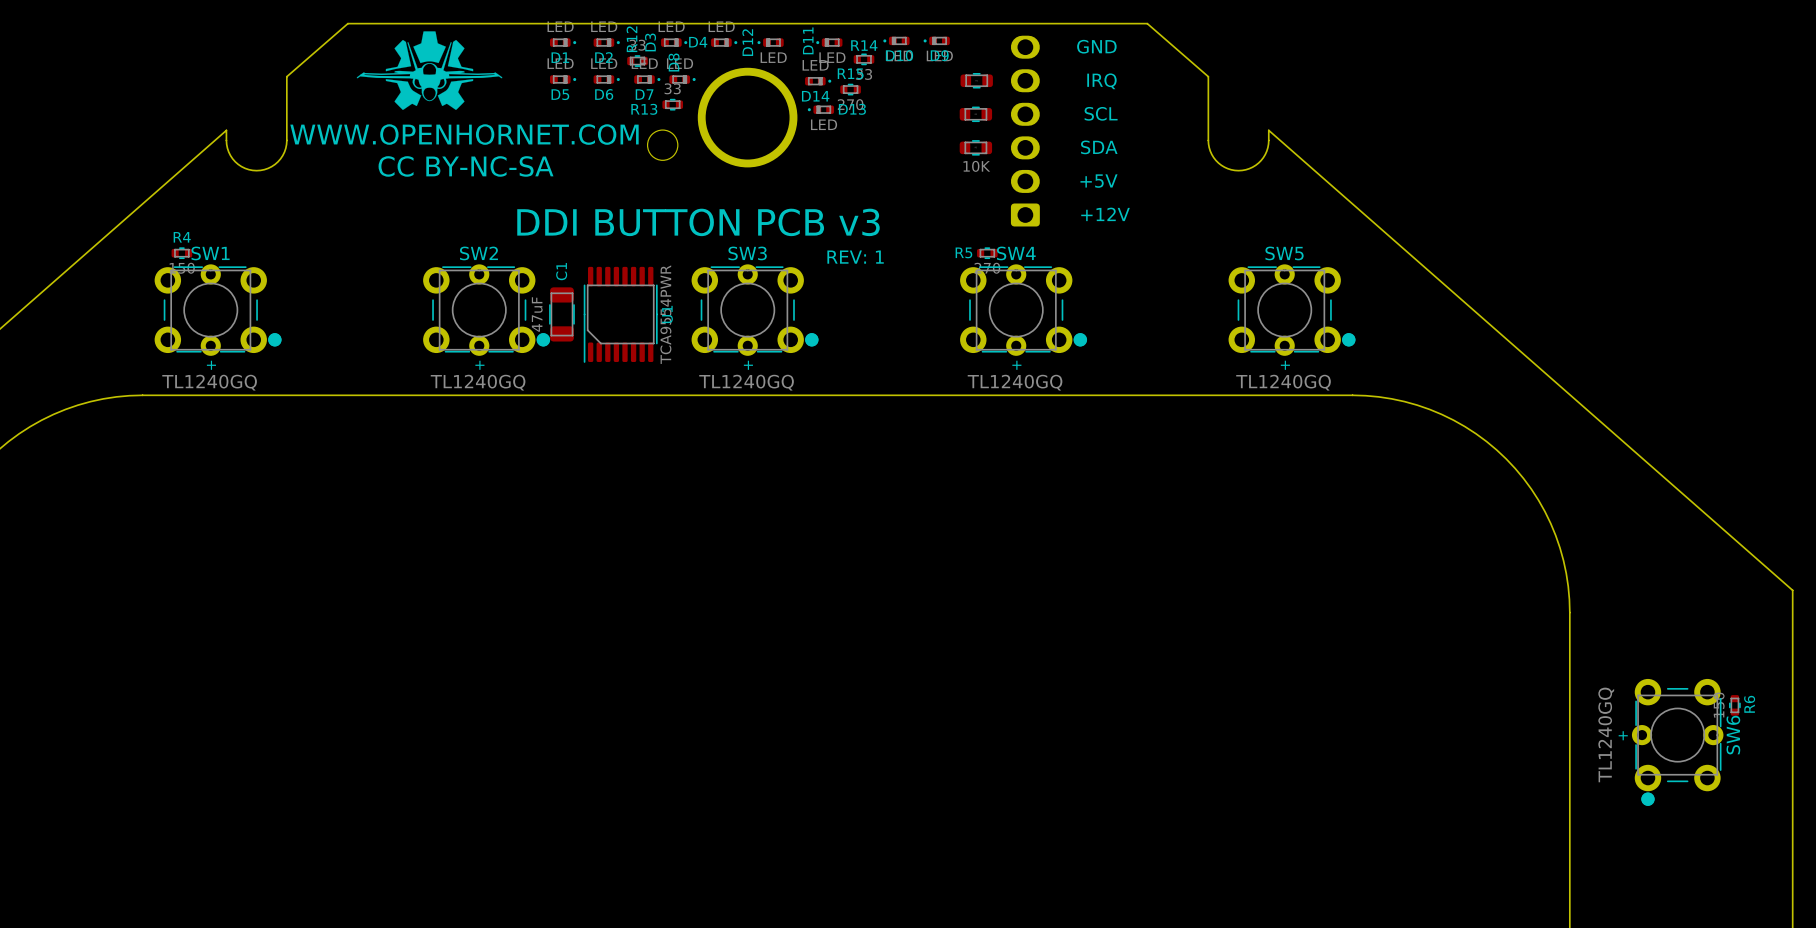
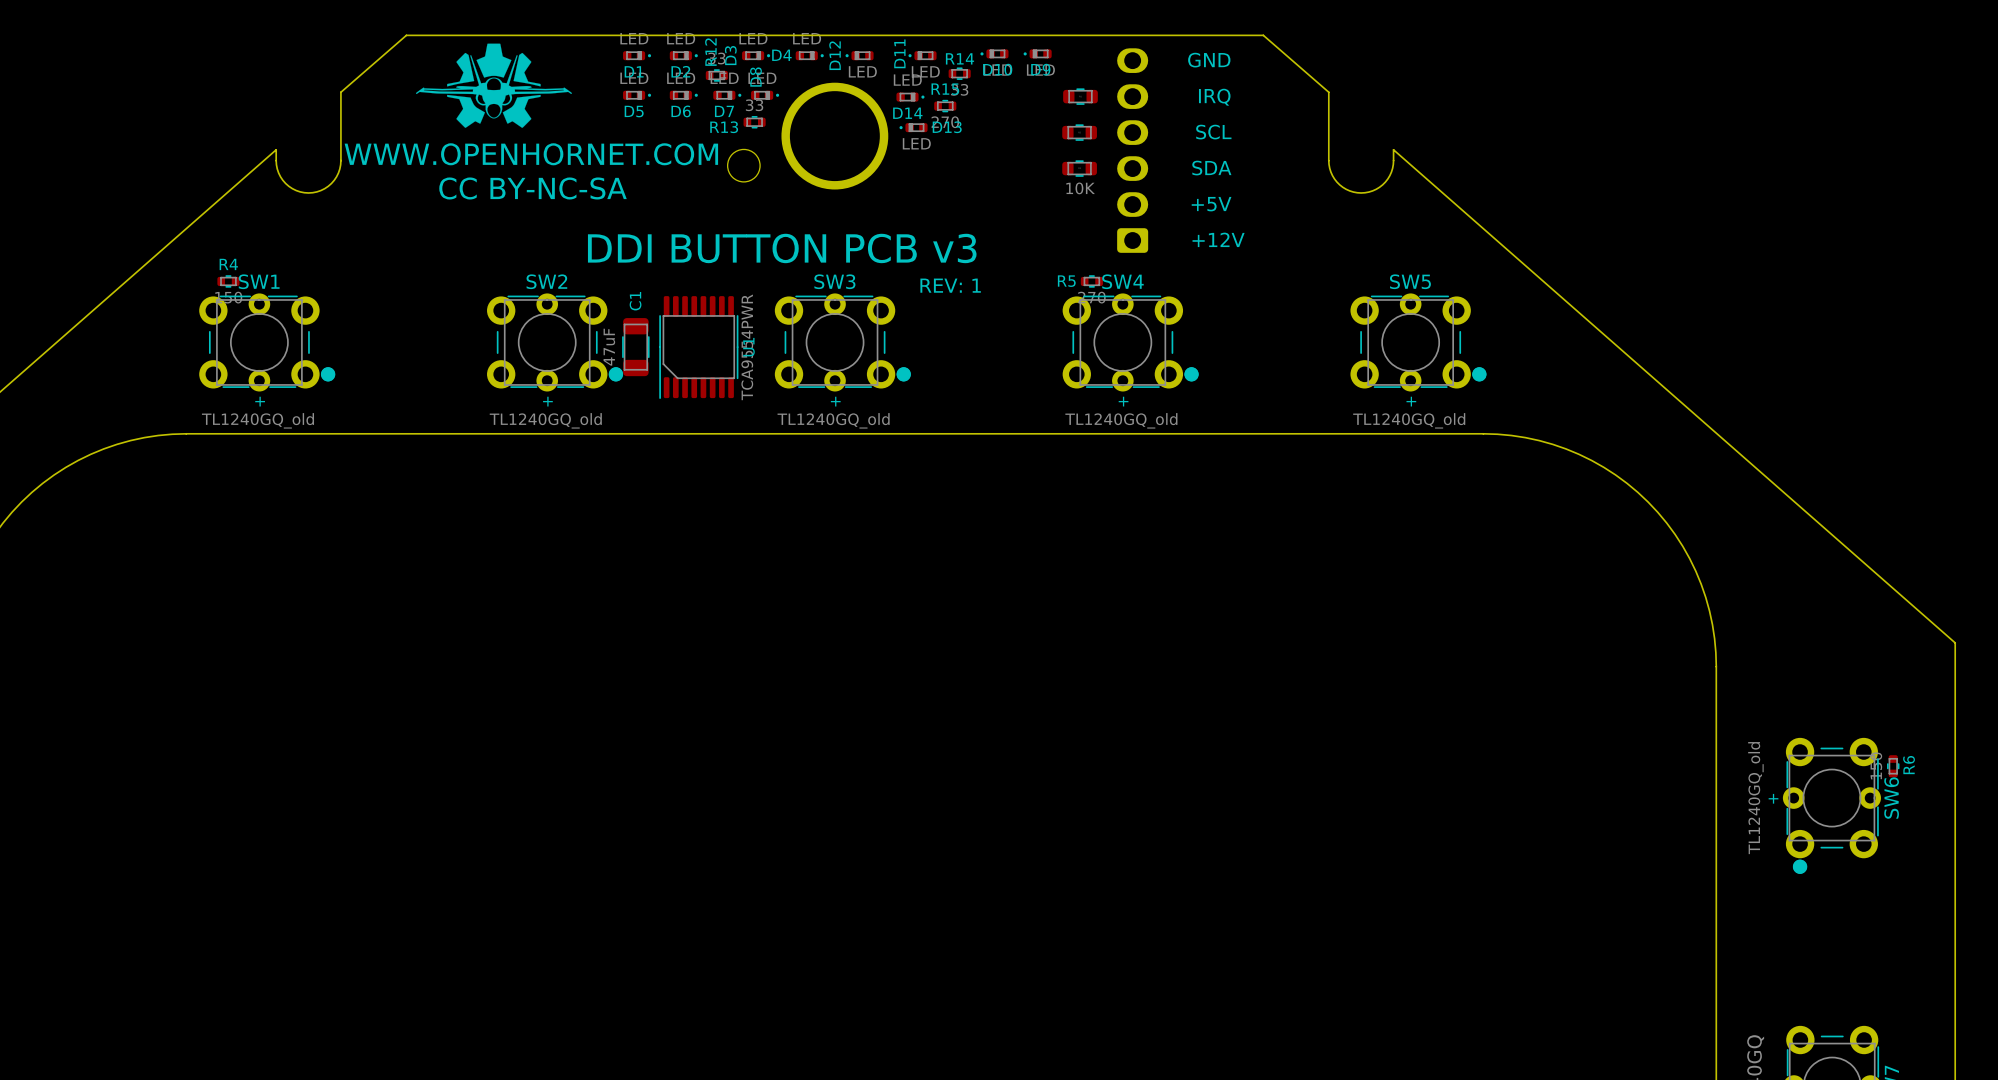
SW1 value: TL1240GQ (209, 382) -> TL1240GQ_old (257, 420)
SW2 value: TL1240GQ (478, 382) -> TL1240GQ_old (545, 420)
SW3 value: TL1240GQ (746, 382) -> TL1240GQ_old (833, 420)
SW4 value: TL1240GQ (1015, 382) -> TL1240GQ_old (1121, 420)
SW5 value: TL1240GQ (1283, 382) -> TL1240GQ_old (1409, 420)
SW6 value: TL1240GQ (1606, 734) -> TL1240GQ_old (1755, 798)

